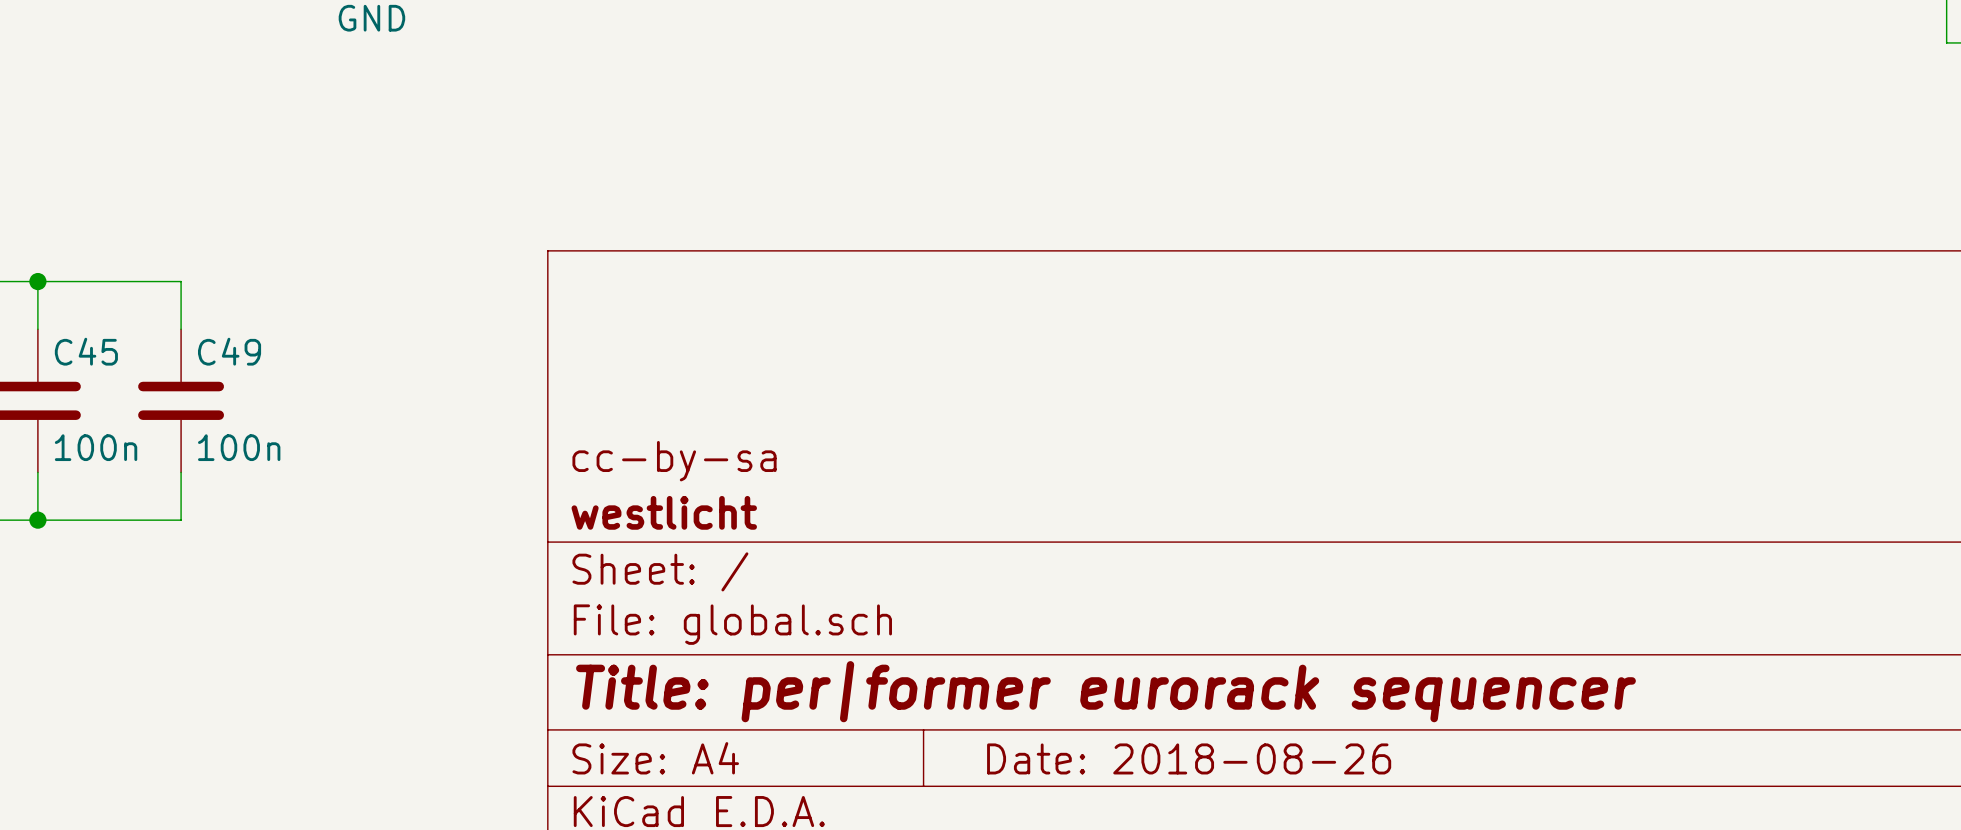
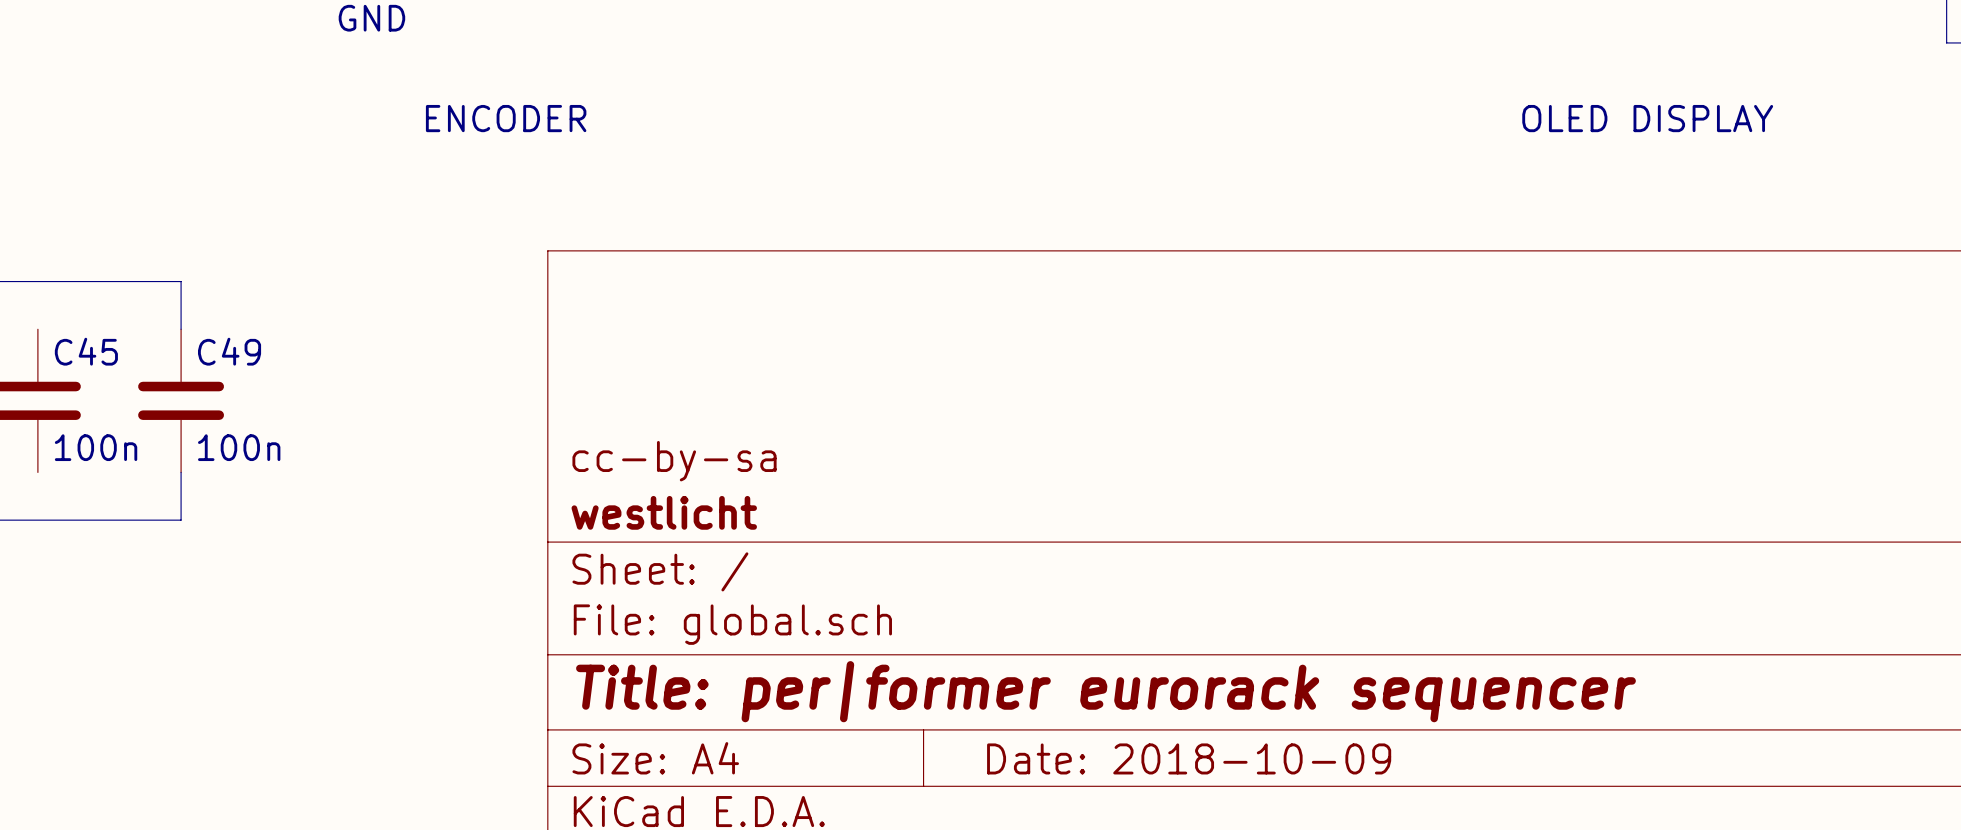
text: none -> ENCODER (506, 118)
text: none -> OLED DISPLAY (1647, 118)
wire: (37, 281) (37, 329) -> none
junction: (37, 281) -> none
wire: (37, 472) (37, 520) -> none
junction: (37, 520) -> none
title block: Date: 2018-08-26 (1189, 758) -> Date: 2018-10-09 (1189, 758)

